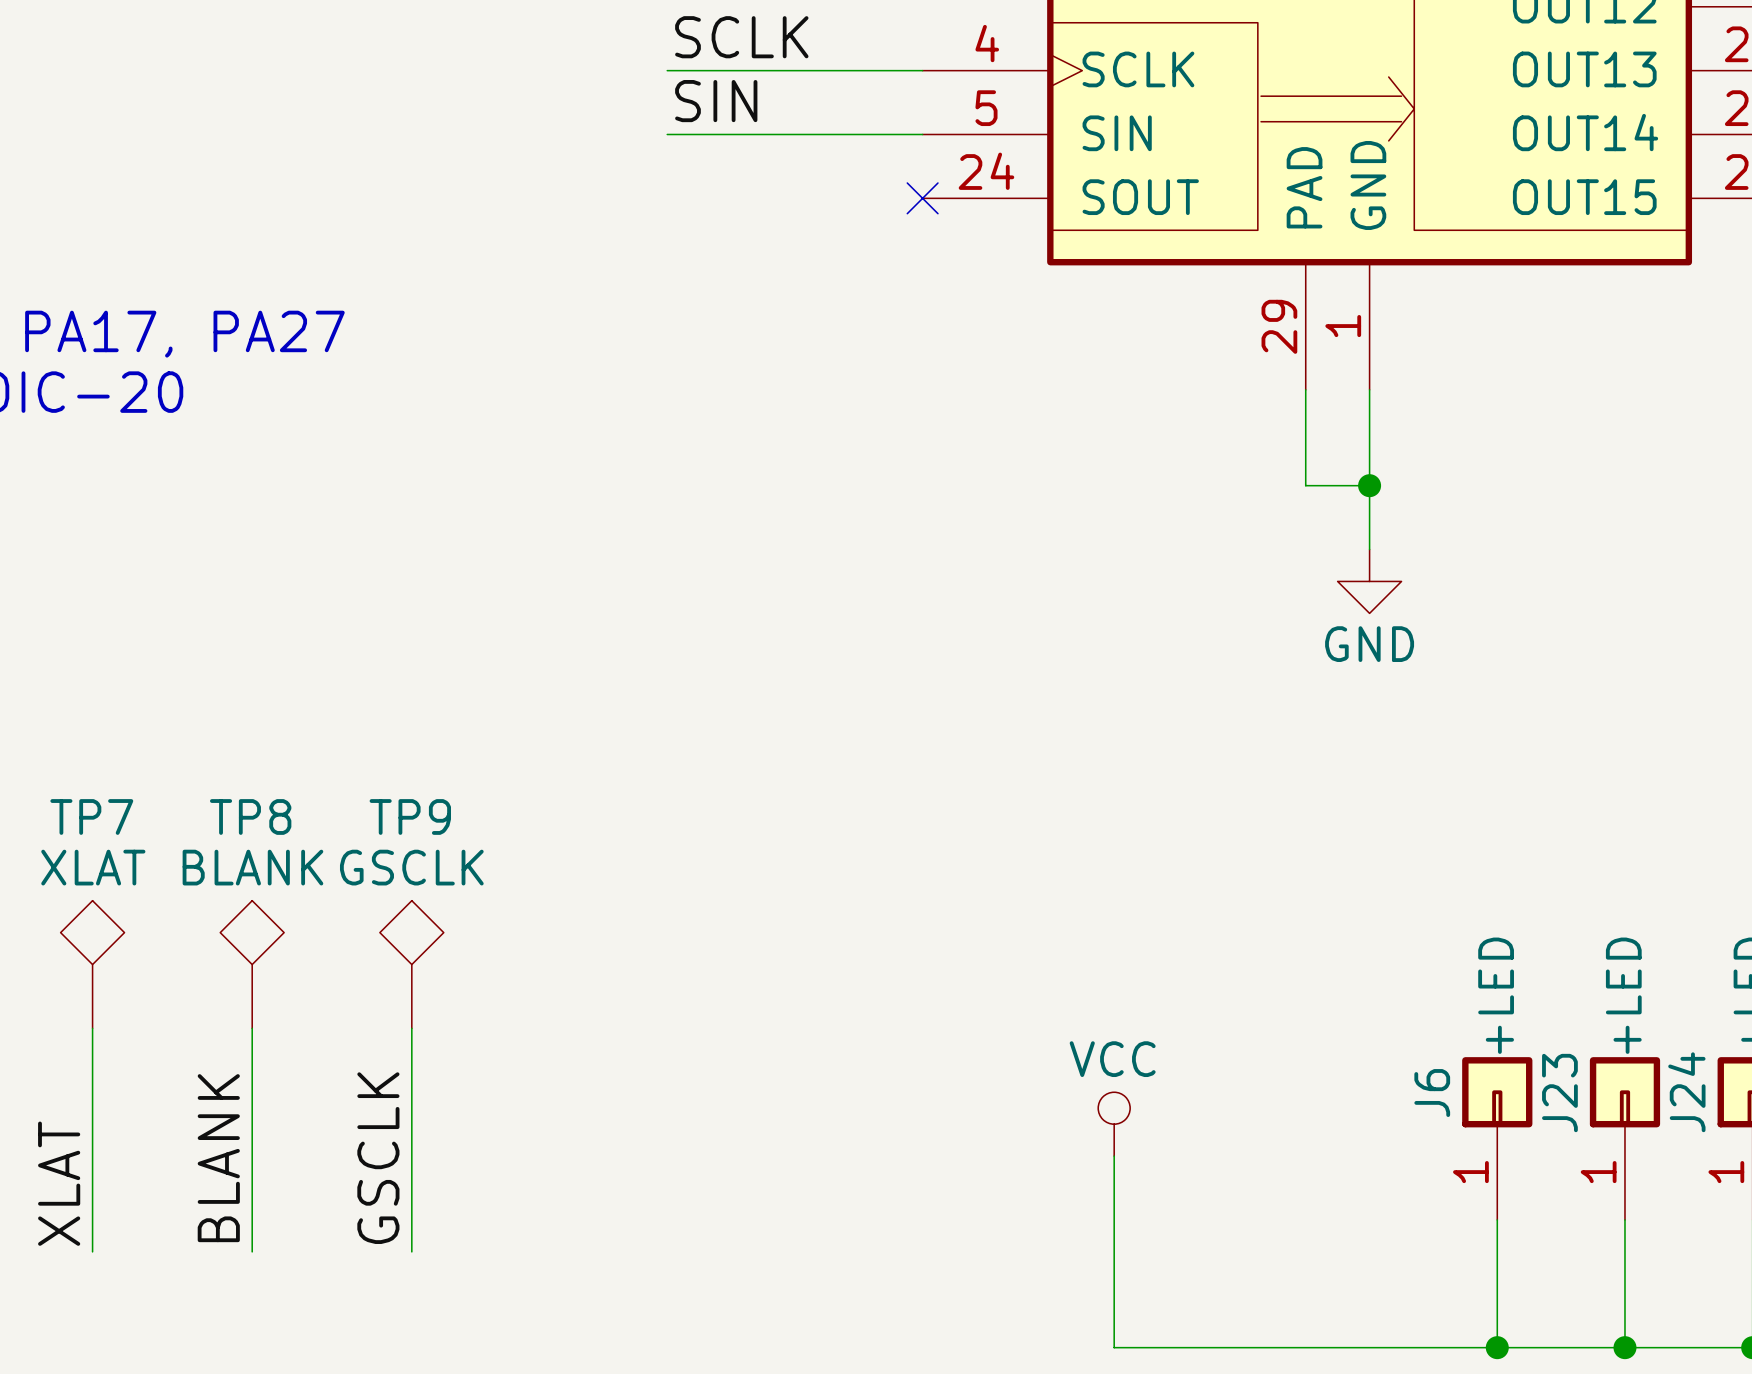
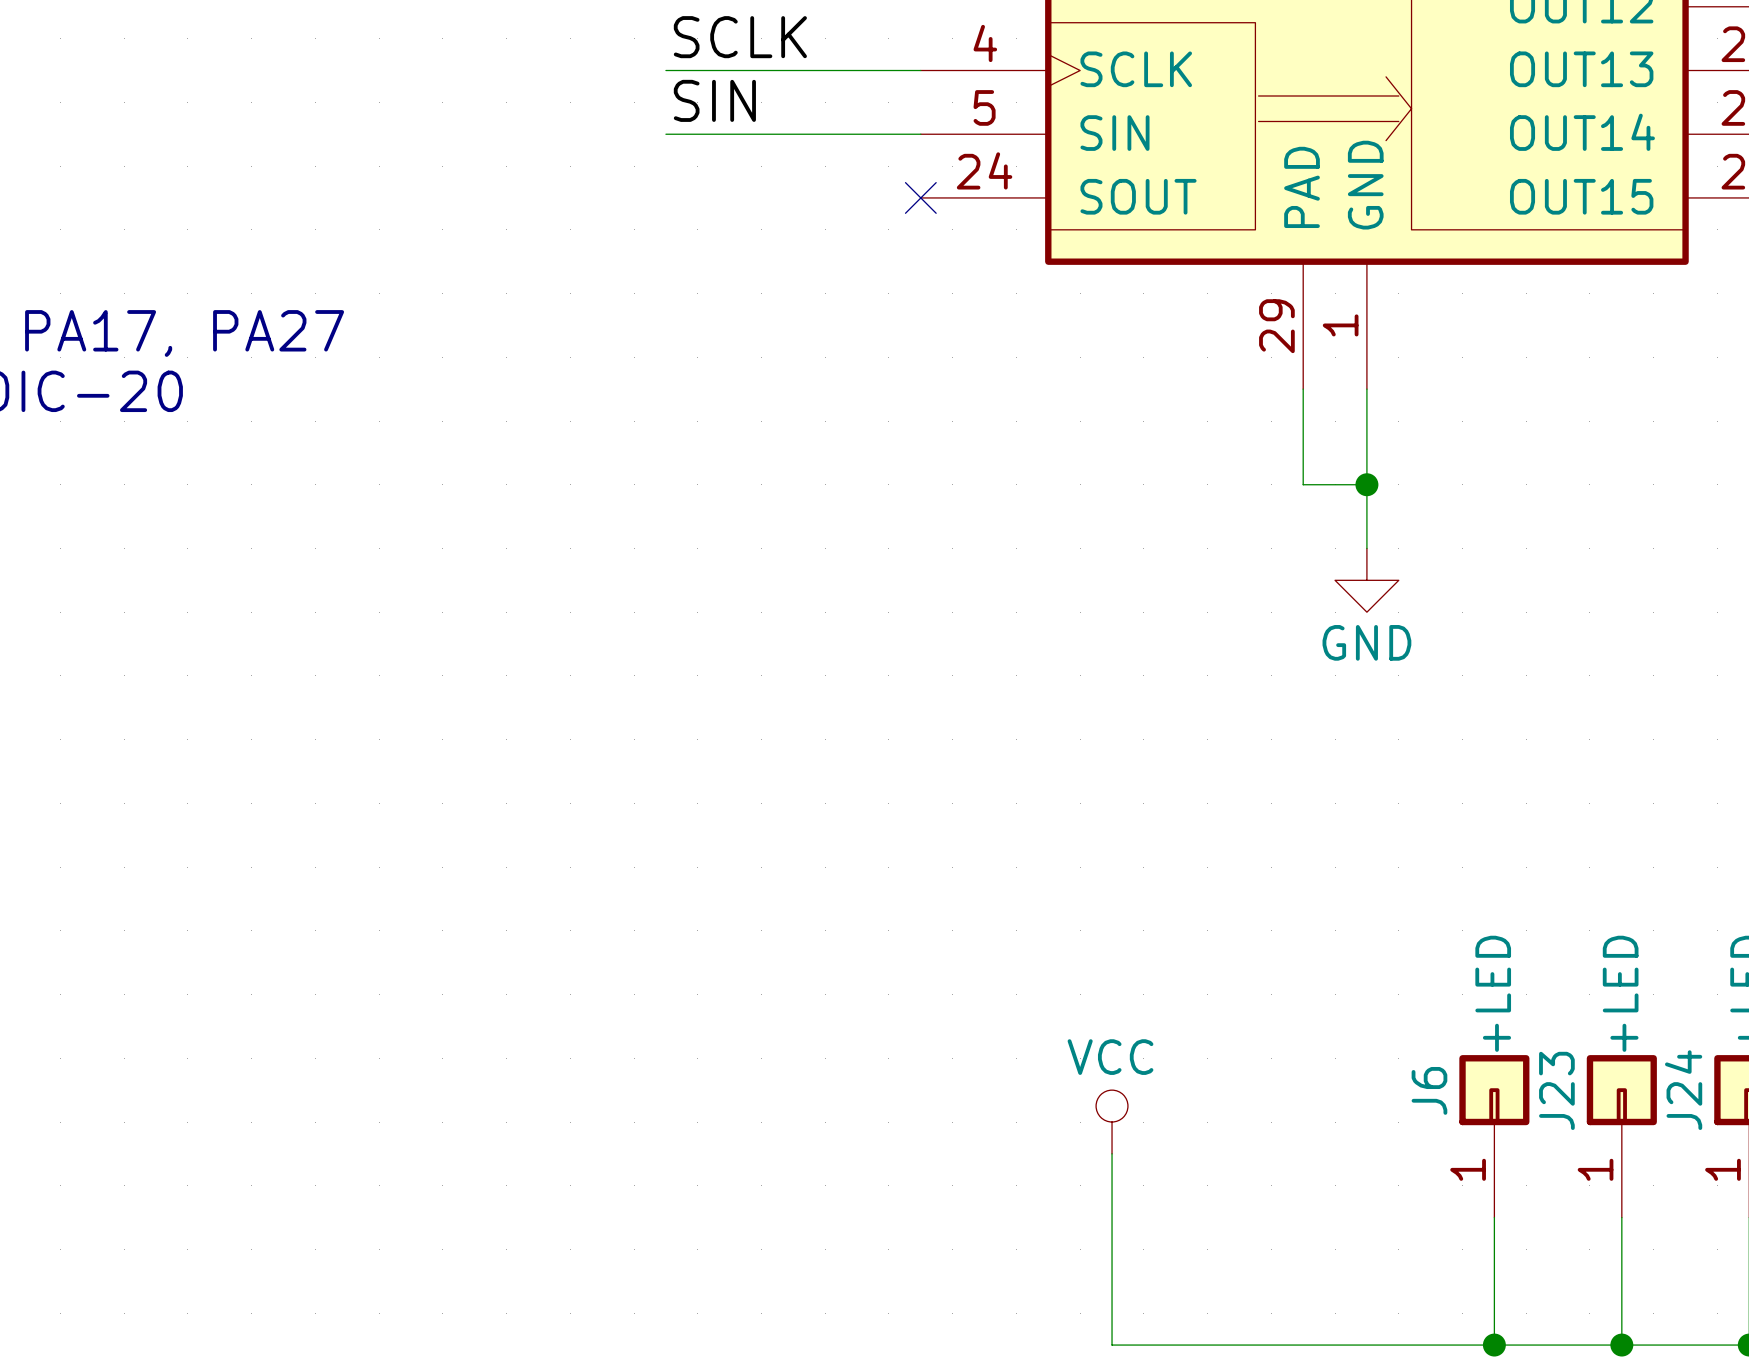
TP7: XLAT (92, 964) -> none
TP8: BLANK (252, 964) -> none
TP9: GSCLK (411, 964) -> none
wire: (92, 1028) (92, 1251) -> none
wire: (252, 1028) (252, 1251) -> none
wire: (411, 1028) (411, 1251) -> none
label: BLANK (218, 1158) -> none
label: GSCLK (378, 1158) -> none
label: XLAT (59, 1183) -> none

